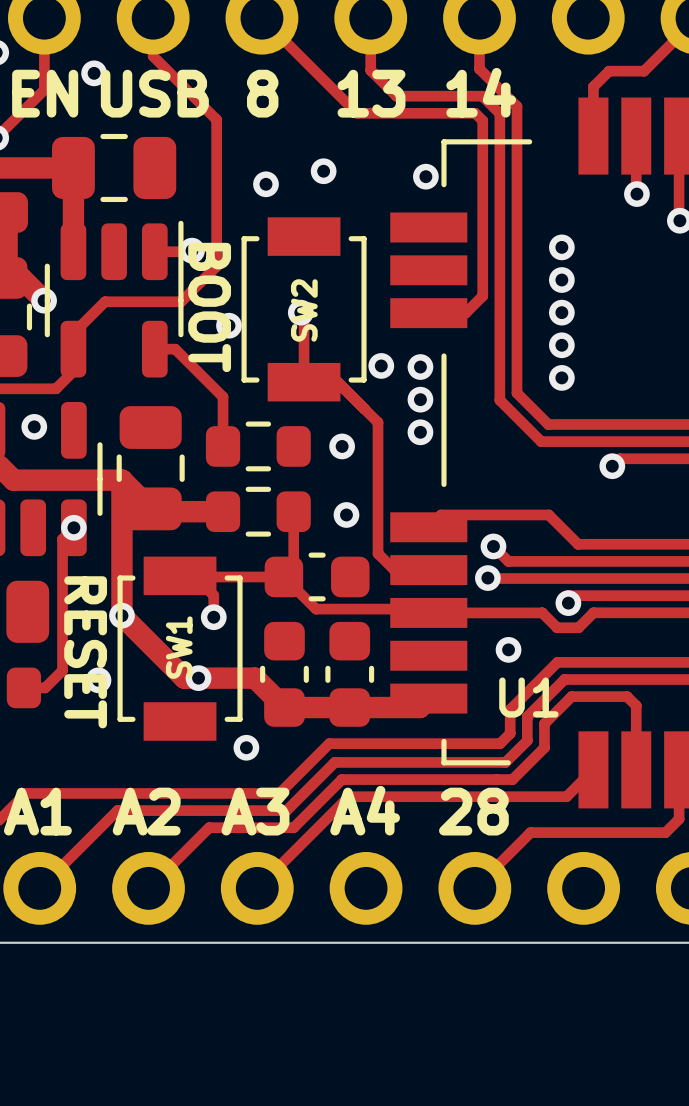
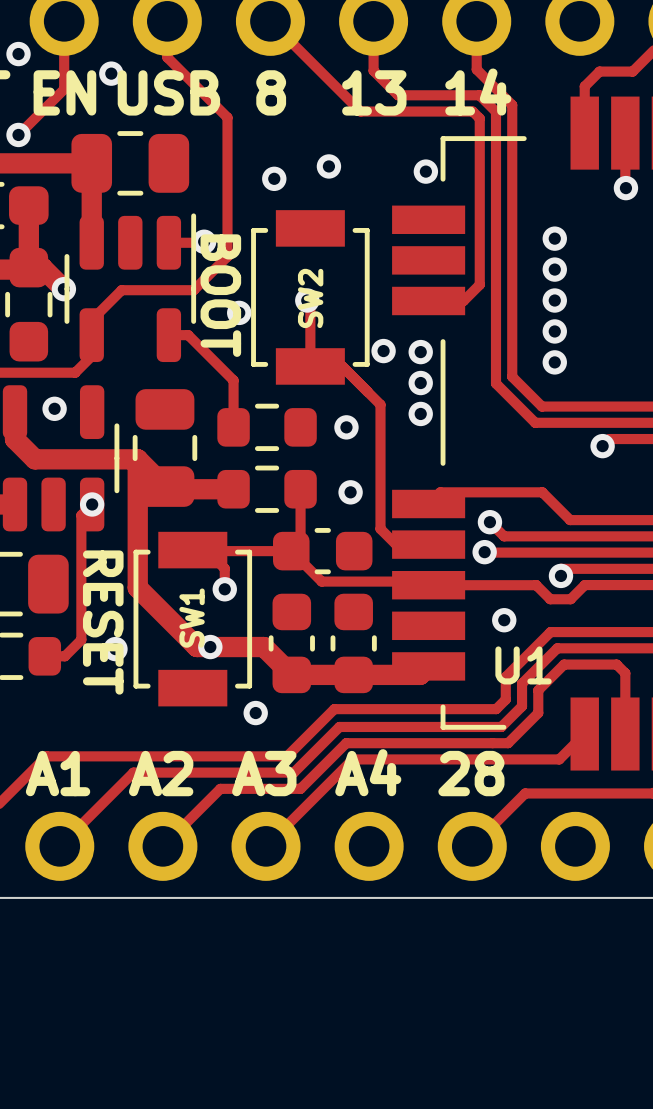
via: (121, 615) -> none

